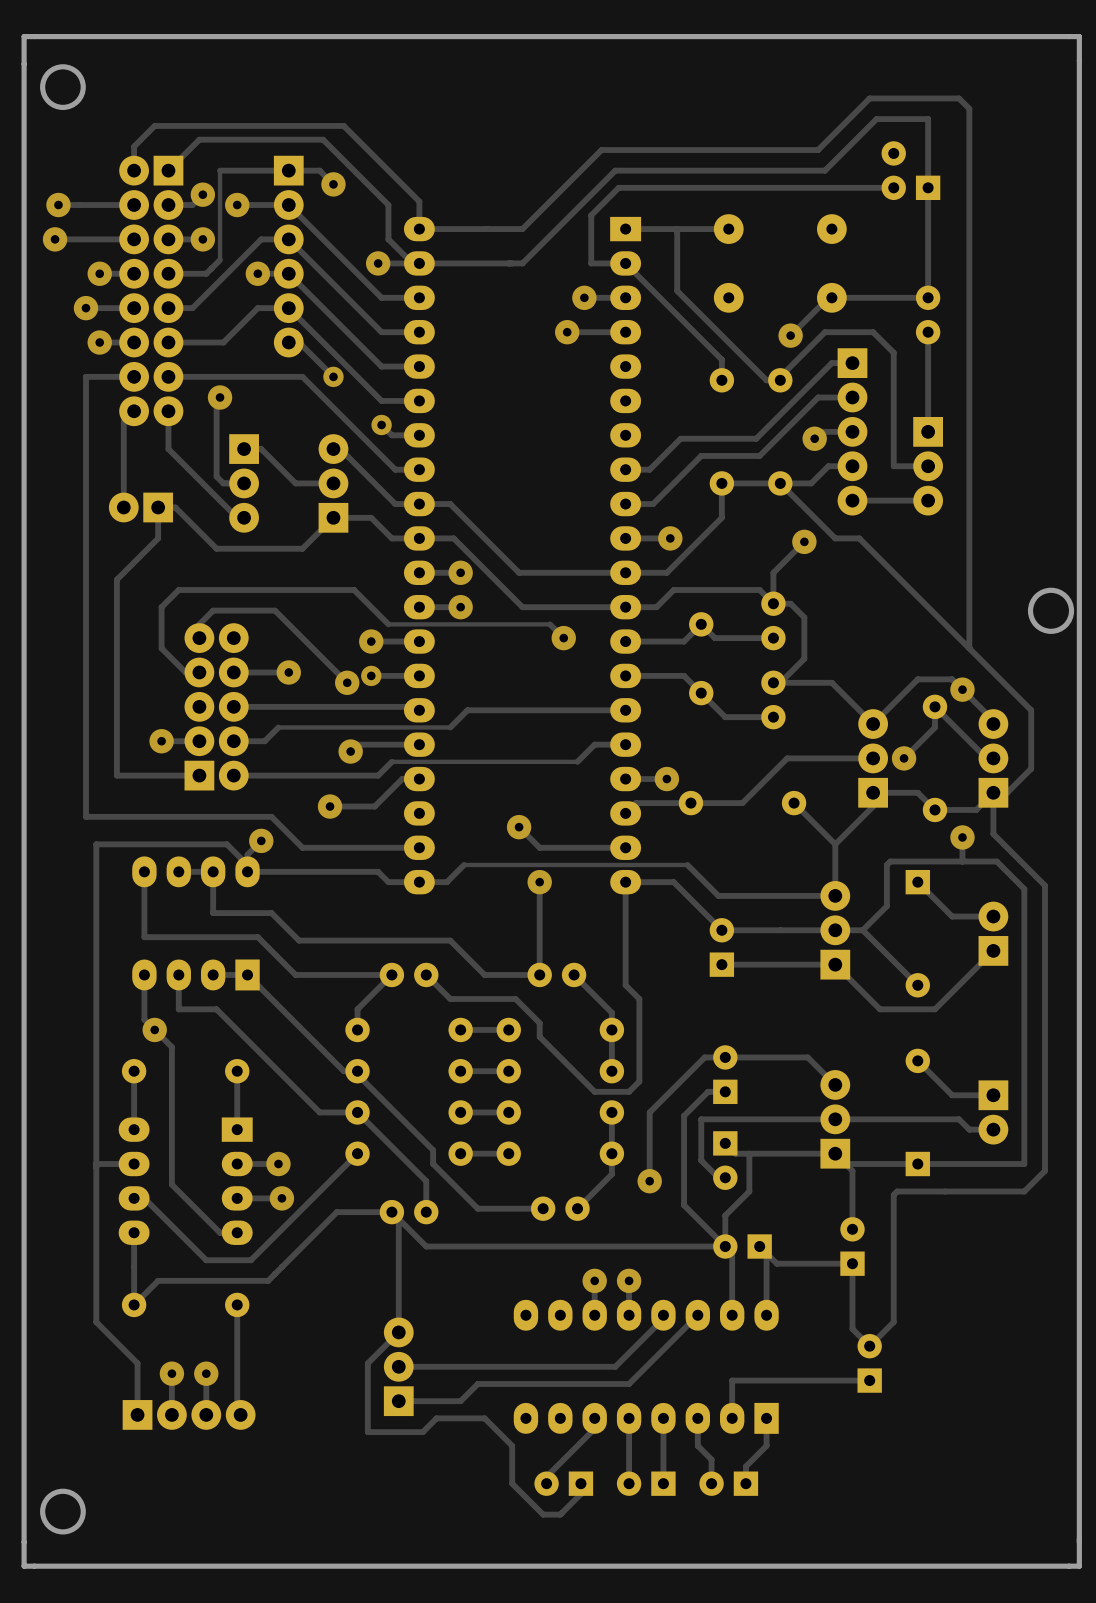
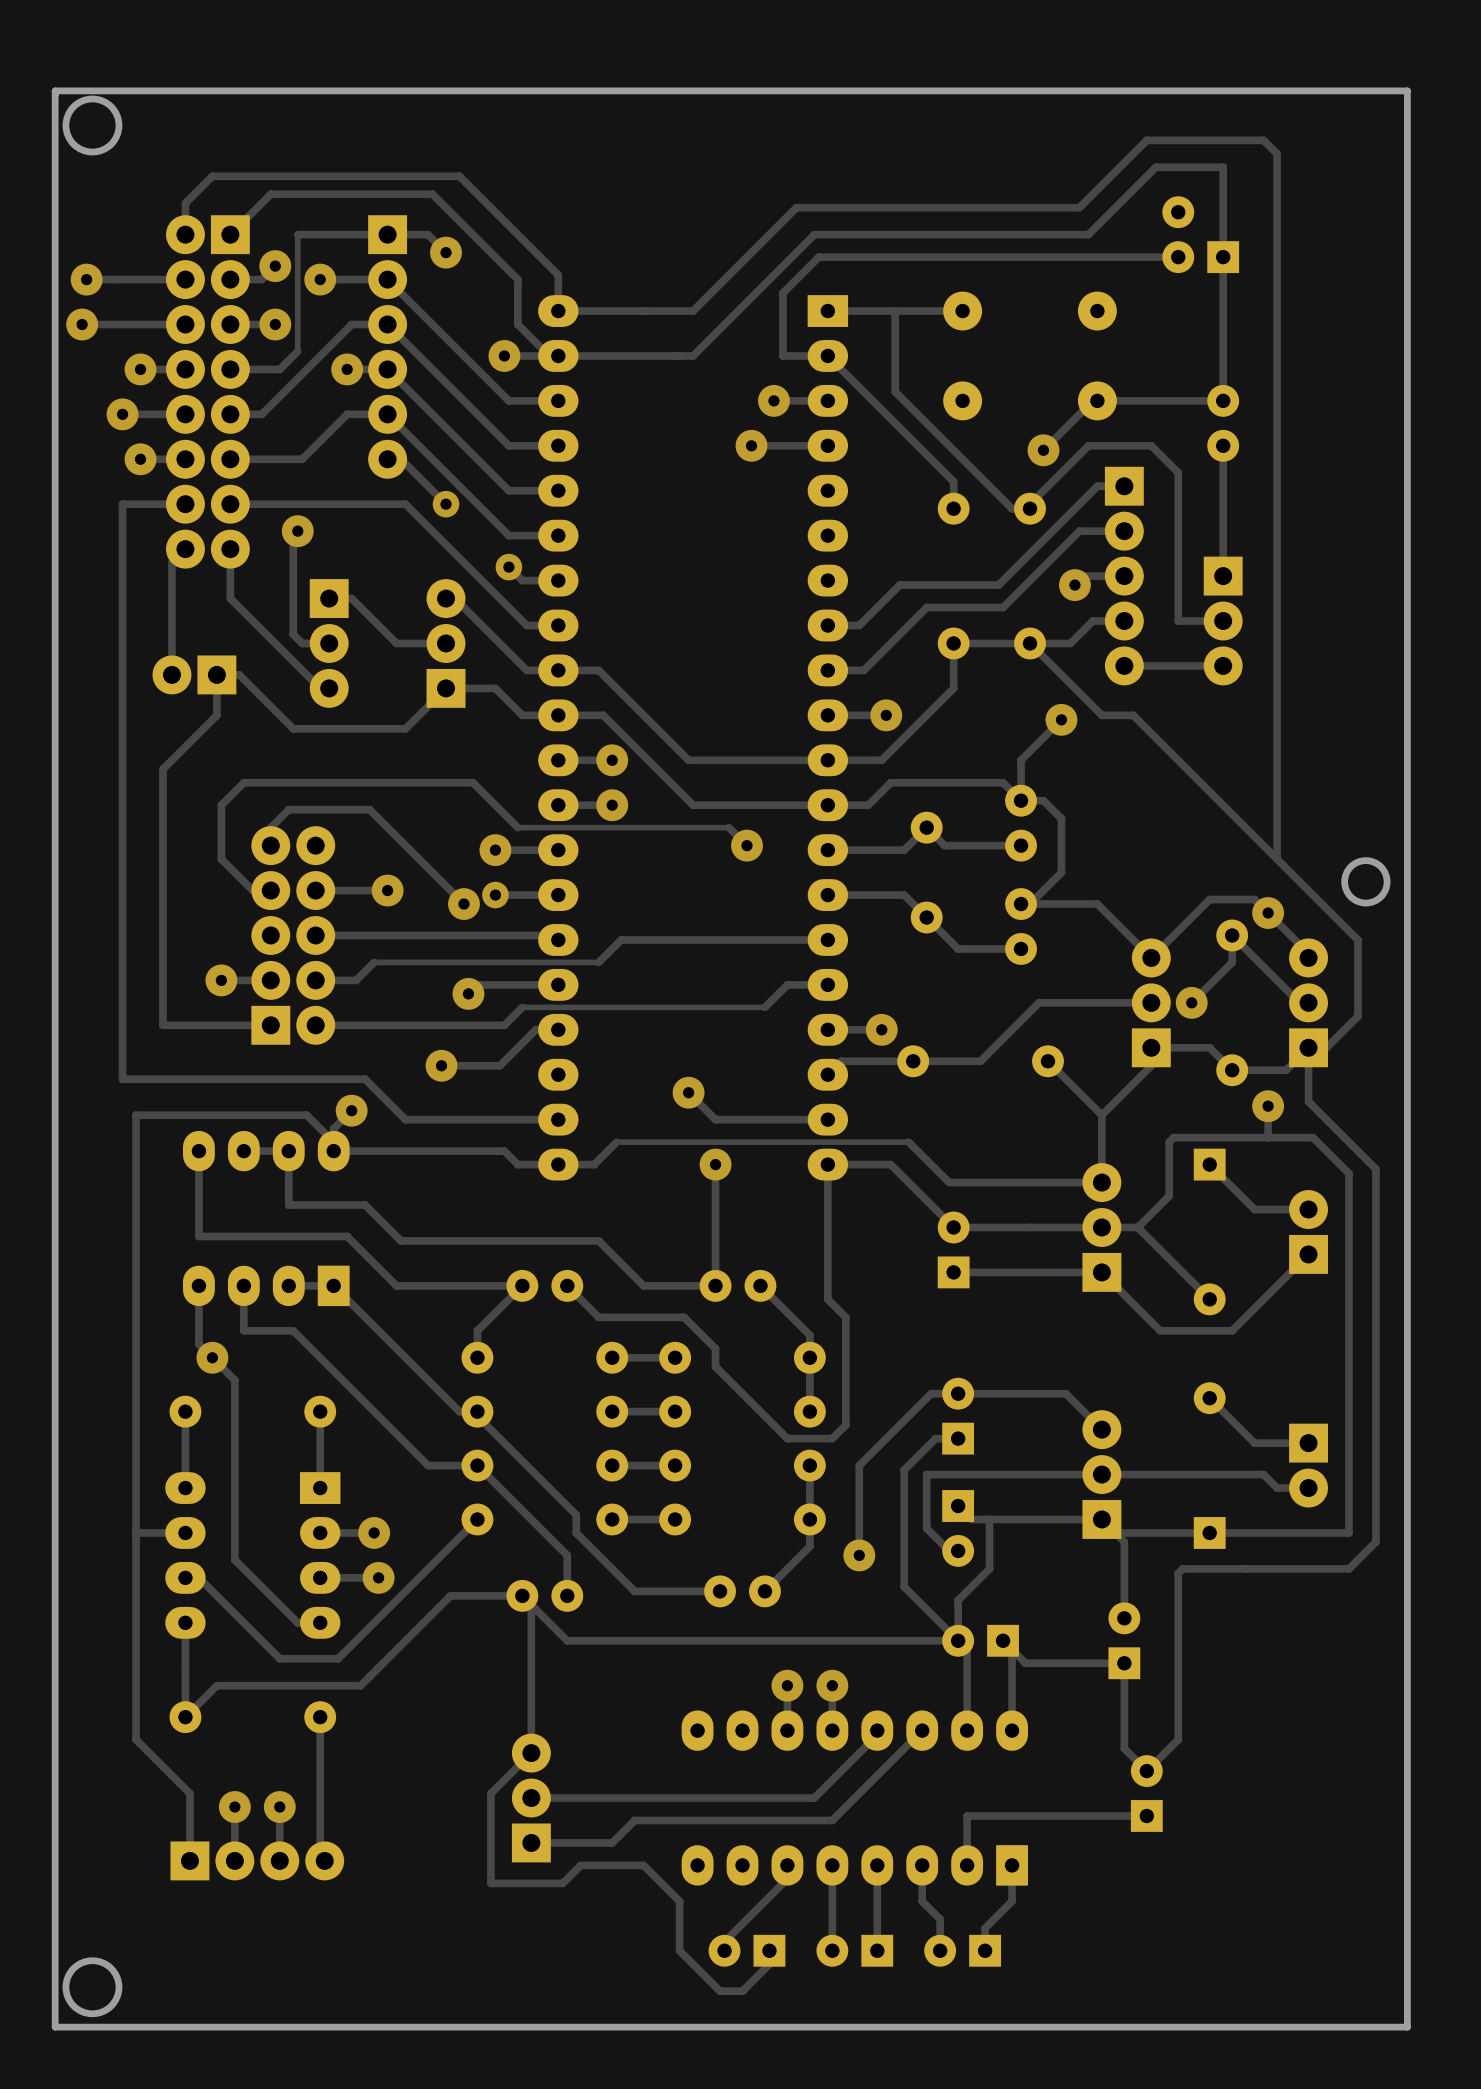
board edge: (1079, 36) (1079, 1566) (24, 1566) (24, 36) (1079, 36) -> (1407, 90) (1407, 2027) (55, 2027) (55, 90) (1407, 90)
round board edge: [1027, 587, 1075, 634] -> none
round board edge: none -> [1341, 857, 1391, 907]

